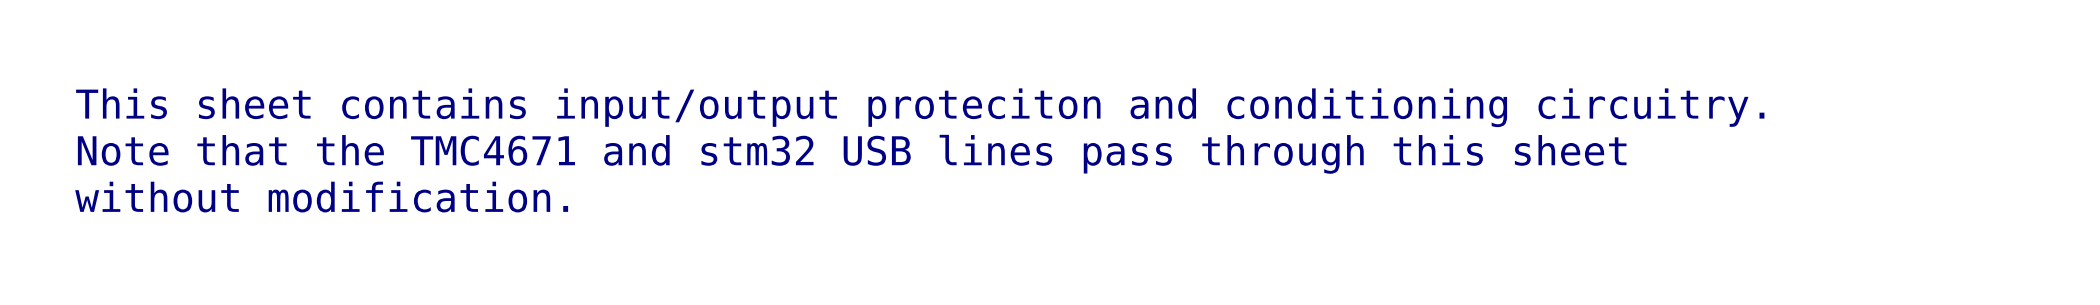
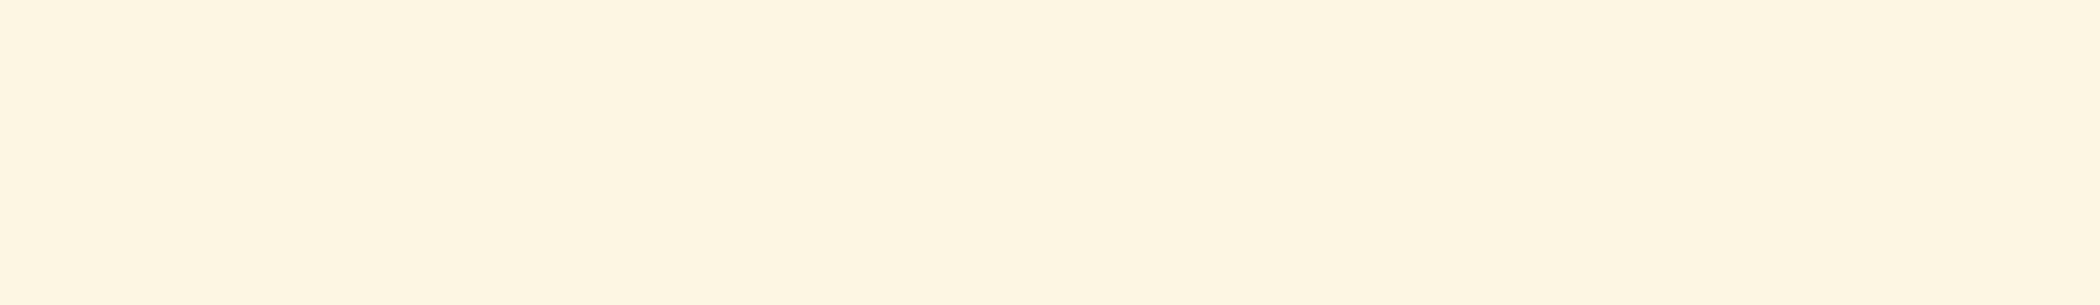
text: This sheet contains input/output proteciton and conditioning circuitry. (920, 107) -> none
text: Note that the TMC4671 and stm32 USB lines pass through this sheet (852, 154) -> none
text: without modification. (321, 197) -> none

